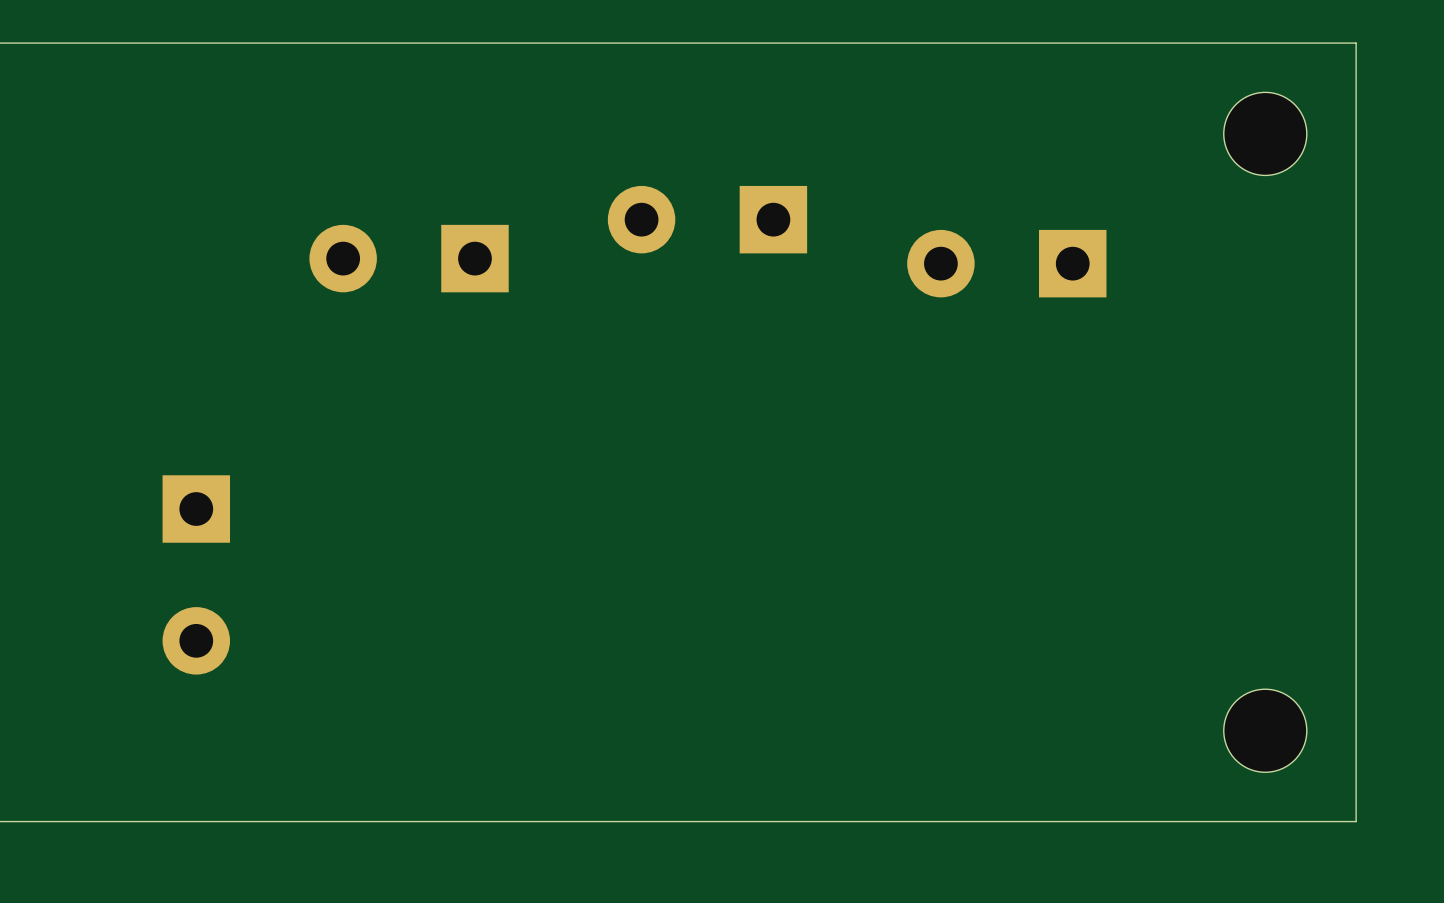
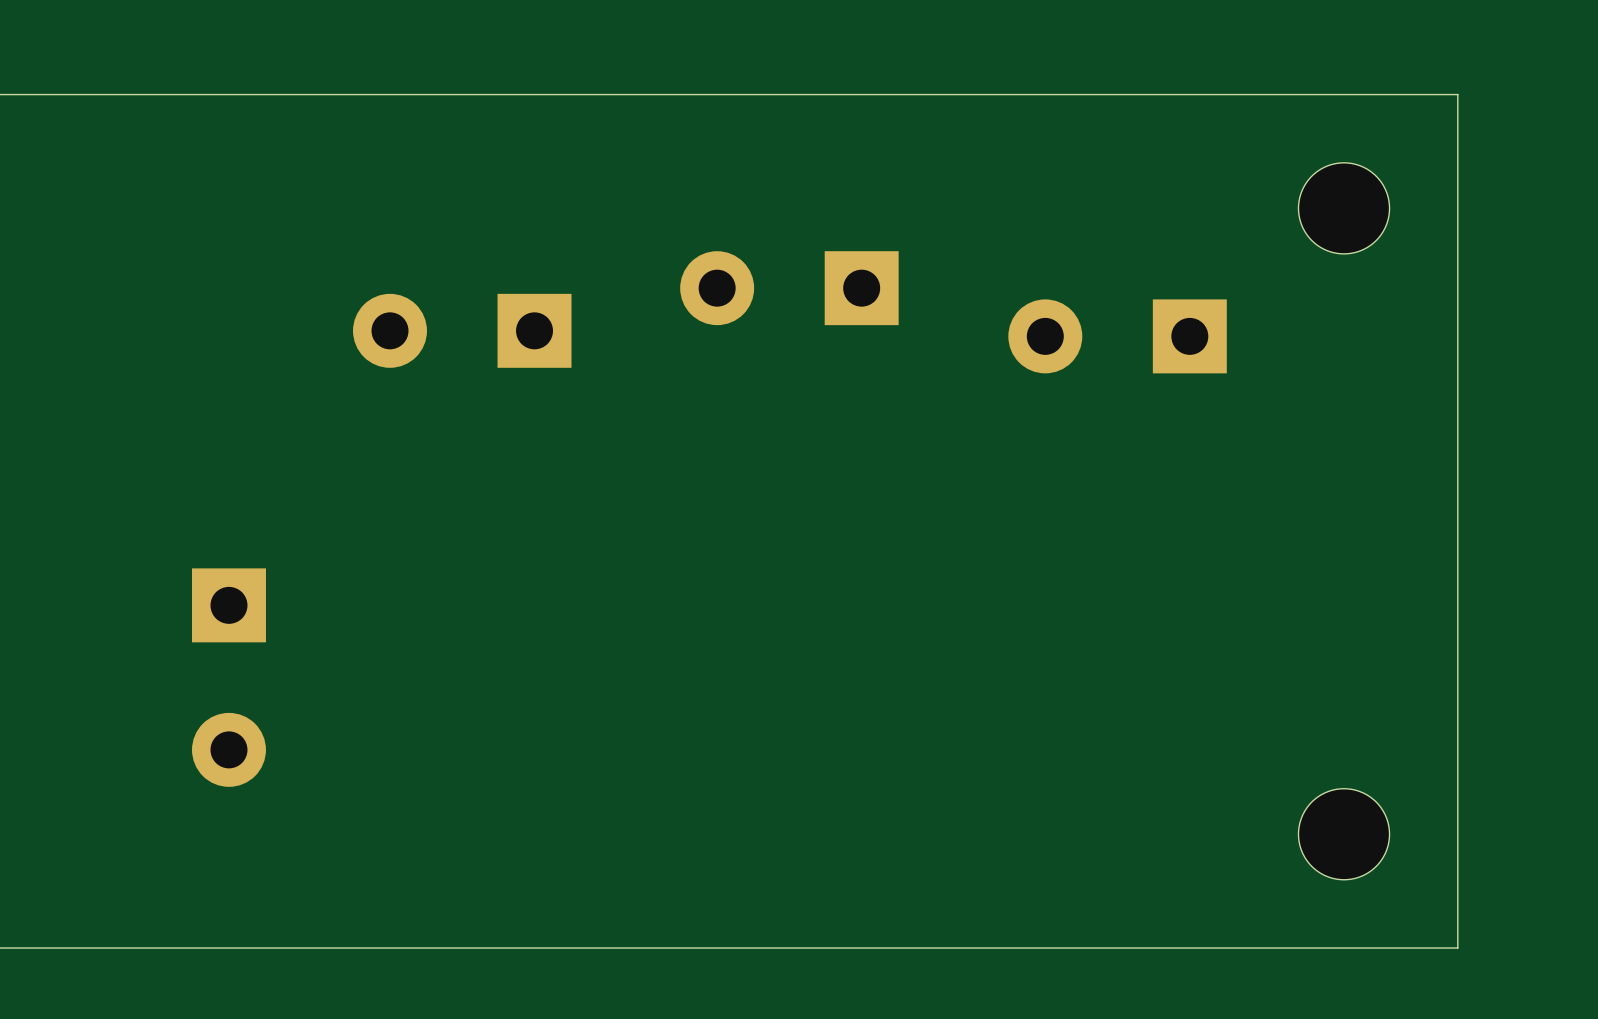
board edge: (1317, 43) (1356, 43) (1356, 821) (1317, 821) -> (1457, 94) (1457, 948)
part position: (1265, 133) -> (1344, 208)
part position: (1265, 730) -> (1344, 834)

